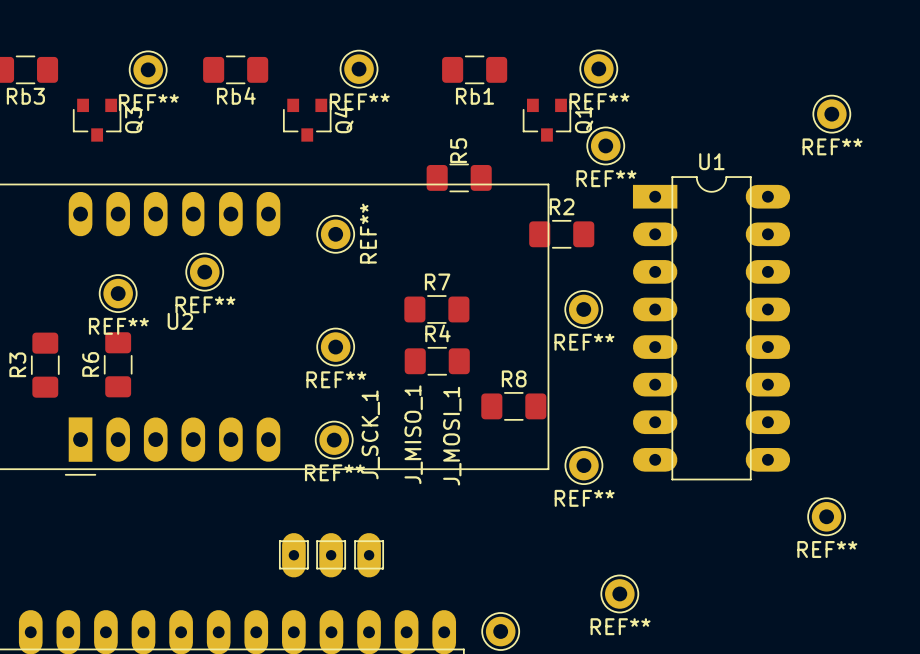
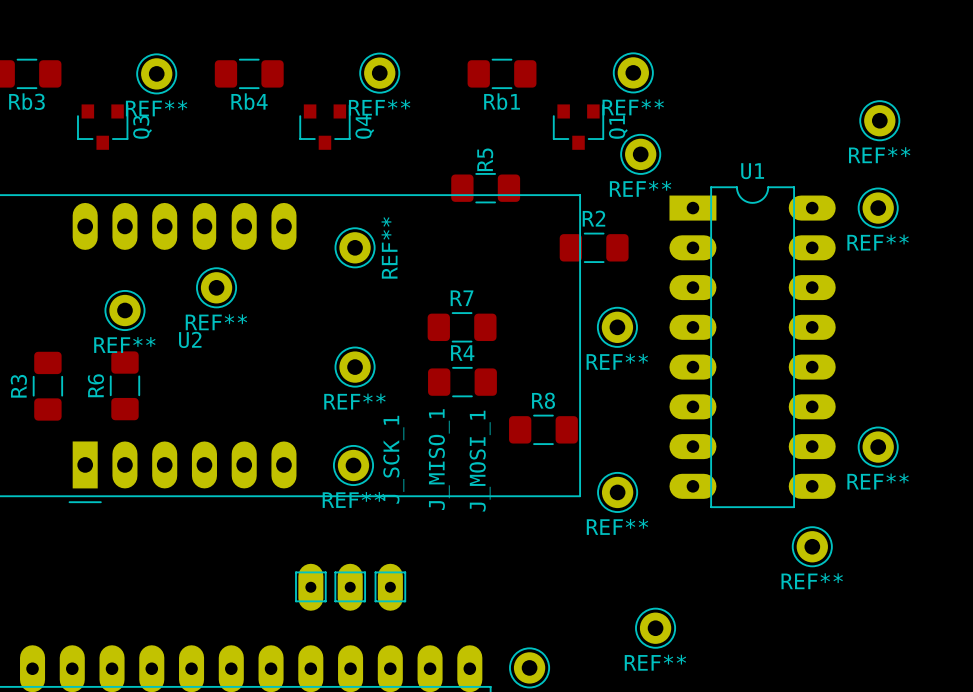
REF**: none -> (878, 208)
REF**: none -> (878, 447)
REF**: none -> (812, 546)
REF**: (826, 516) -> none

